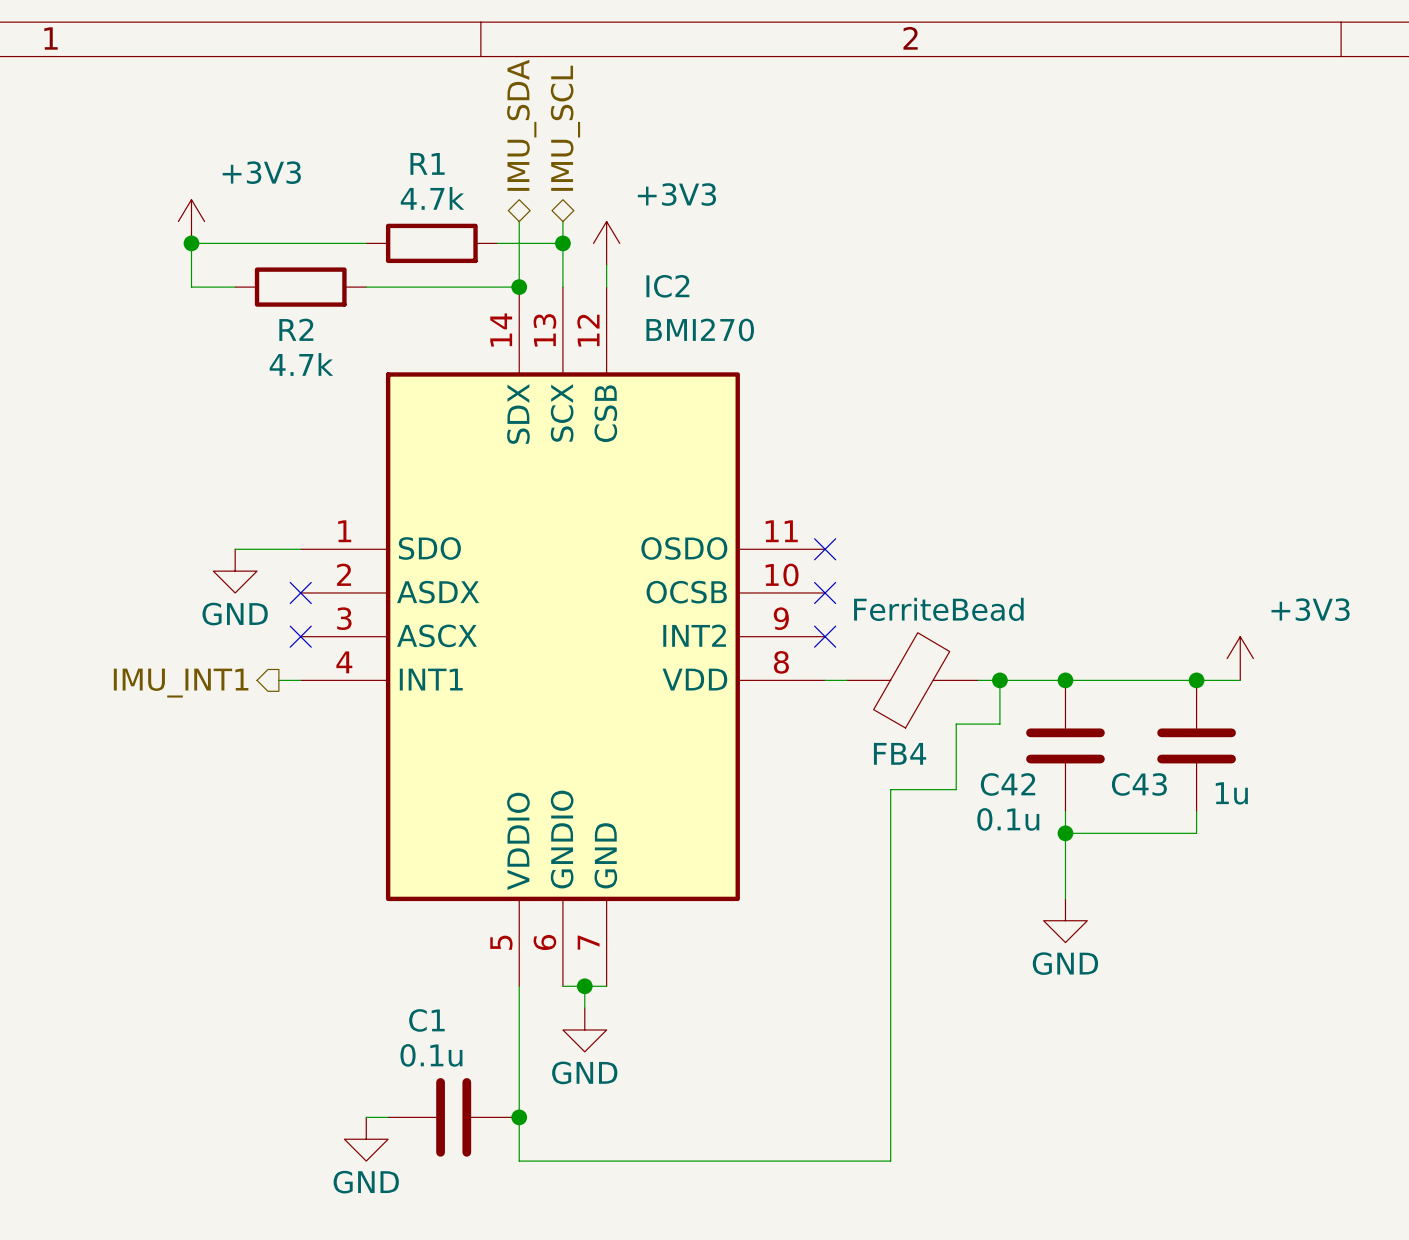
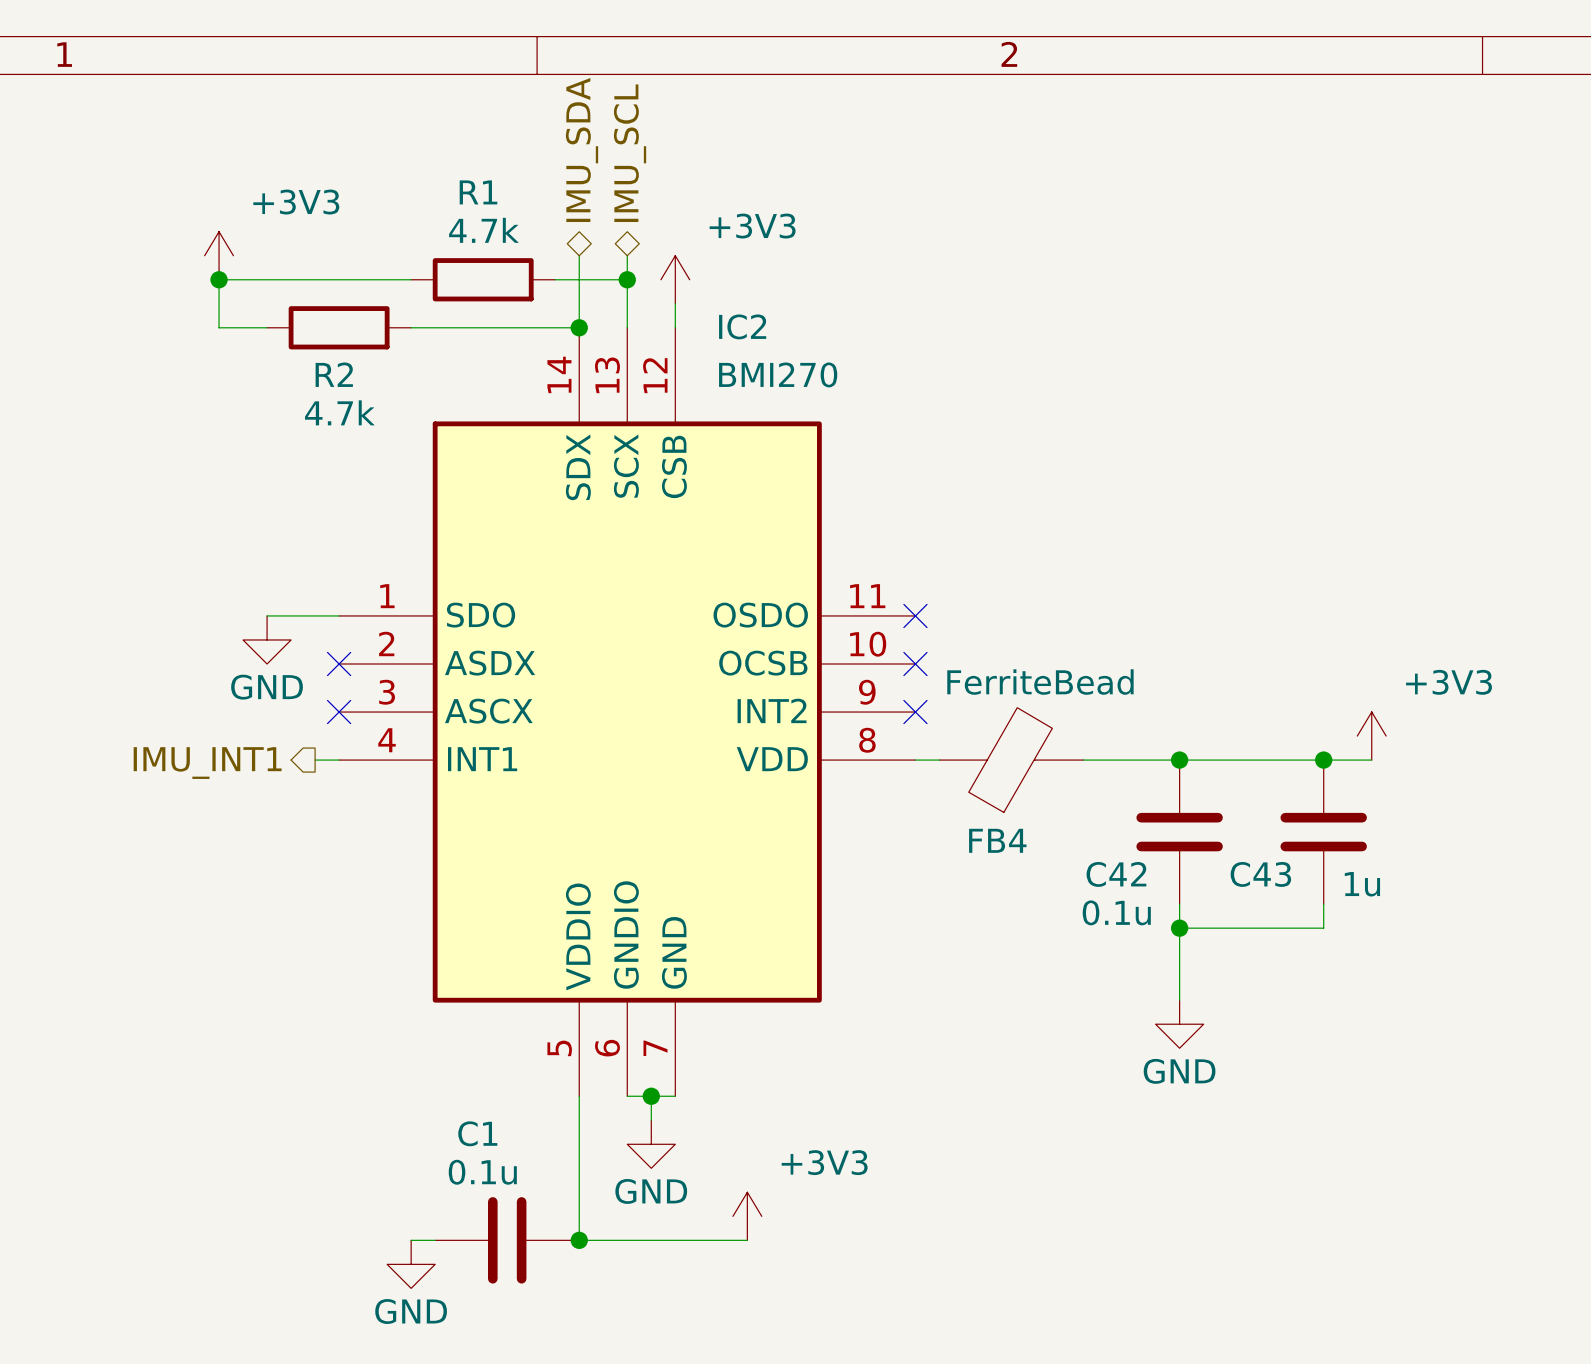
wire: (999, 680) (999, 724) (956, 724) (956, 789) (890, 789) (890, 1161) (519, 1161) (519, 1117) -> (747, 1240) (579, 1240)
junction: (999, 680) -> none
power symbol: none -> +3V3 (747, 1216)

